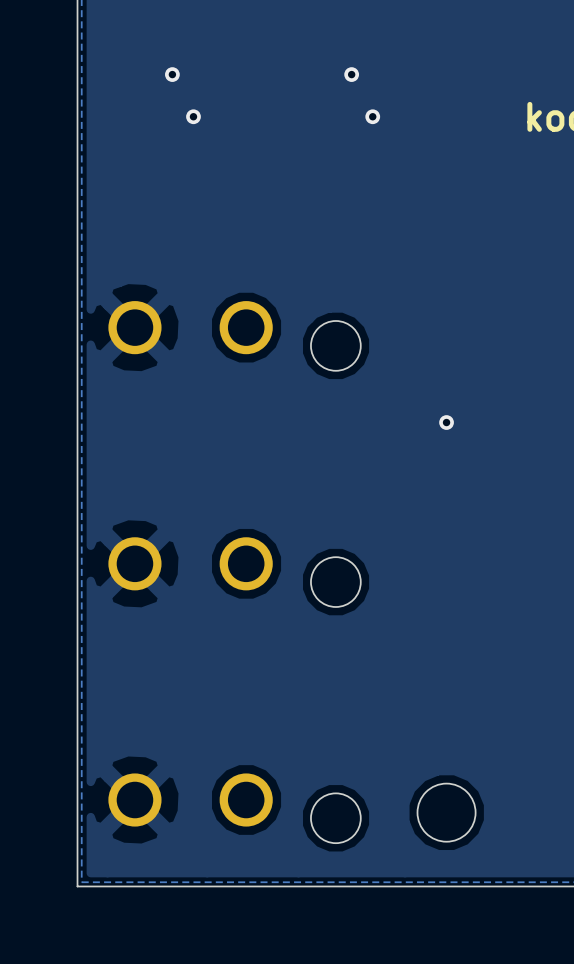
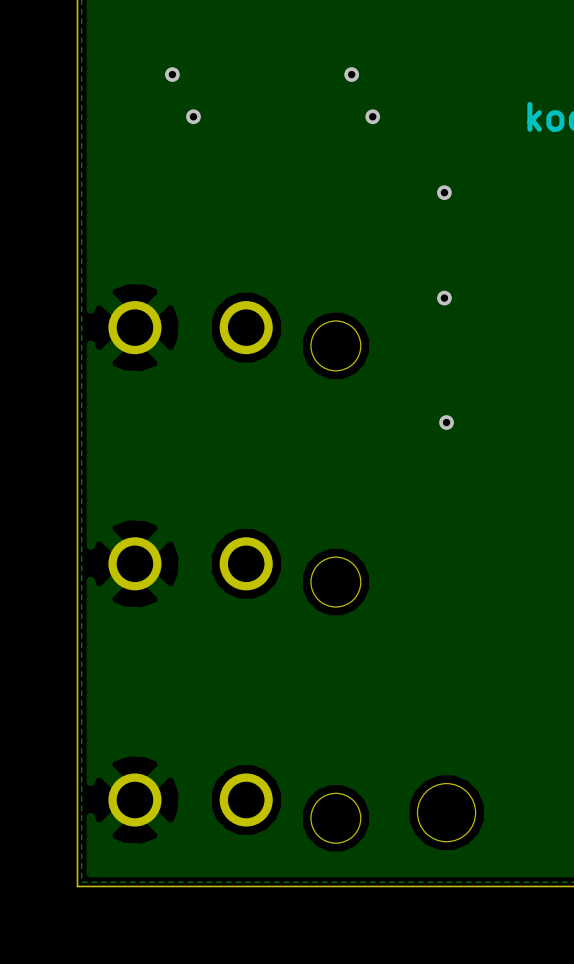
via: none -> (444, 192)
via: none -> (444, 298)

